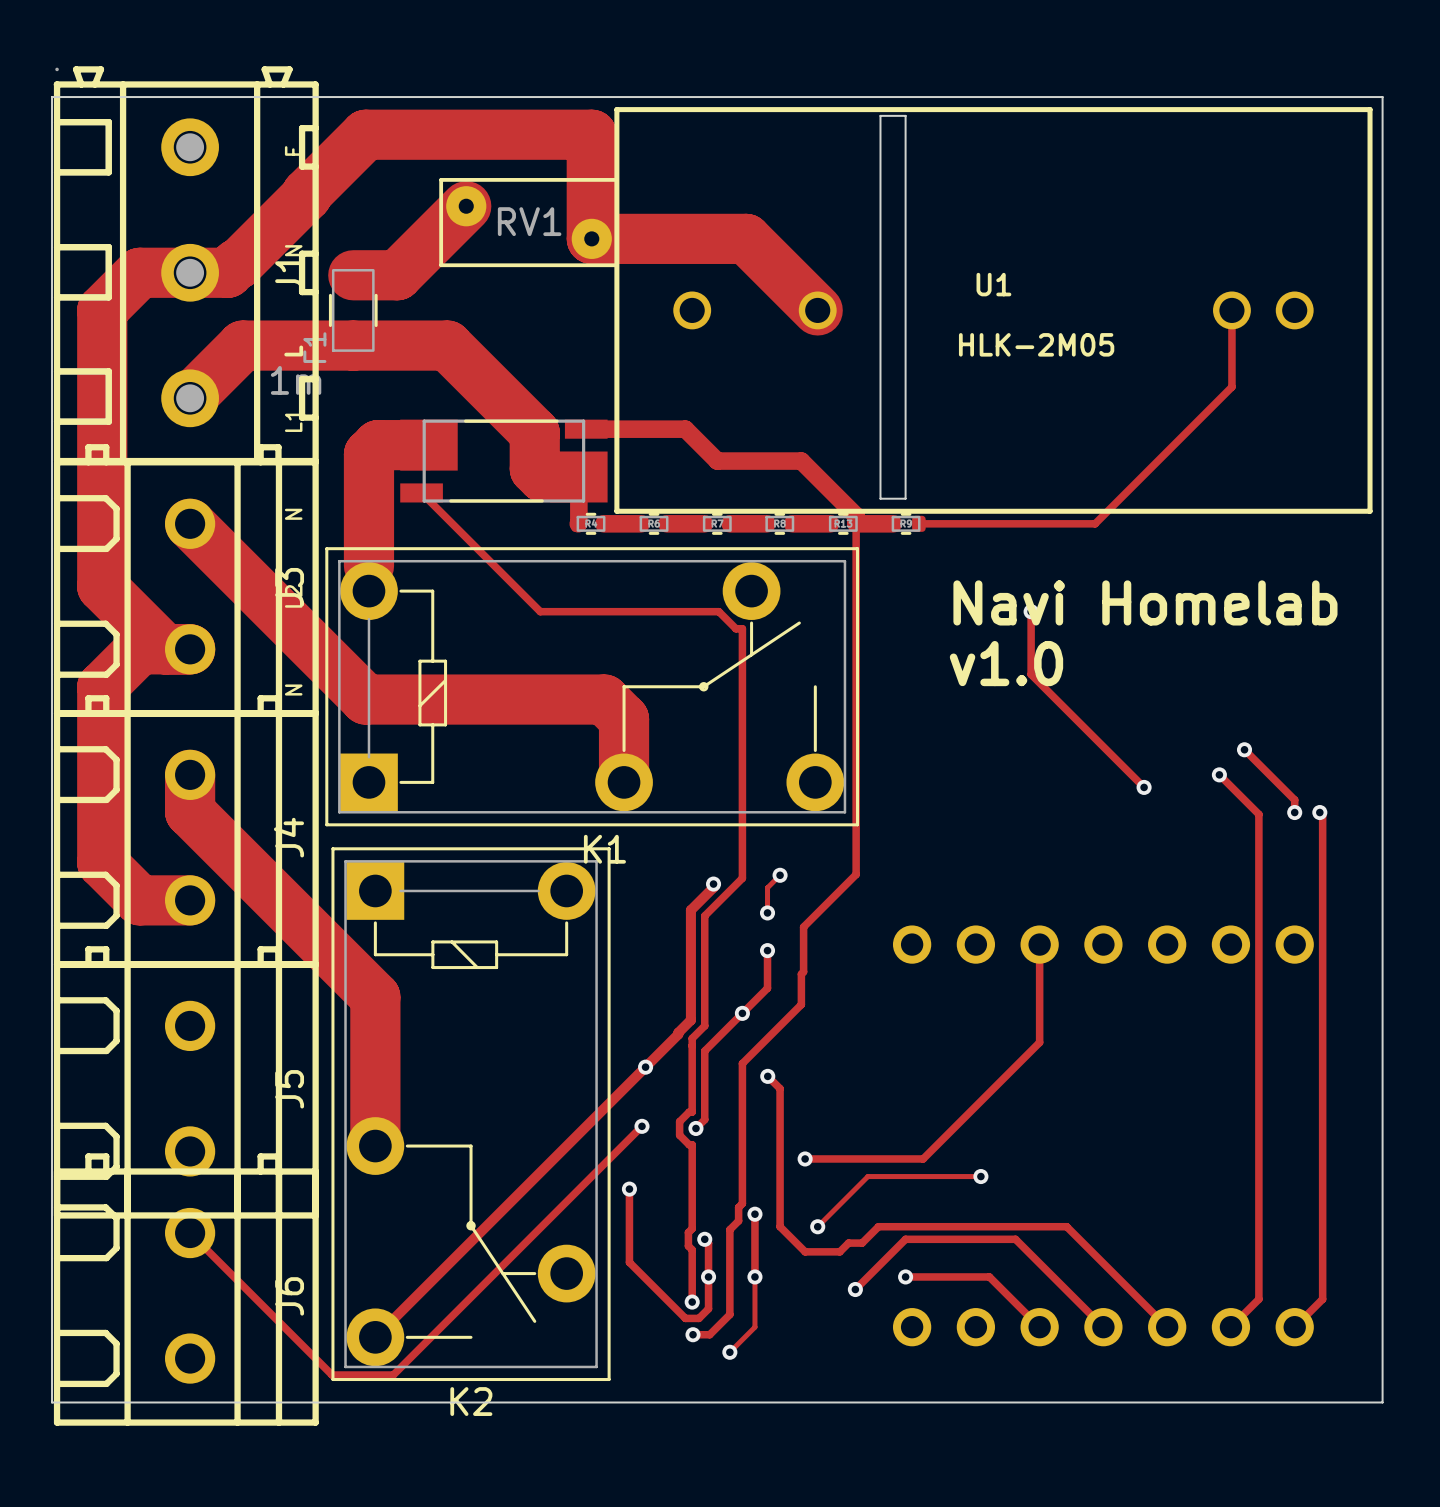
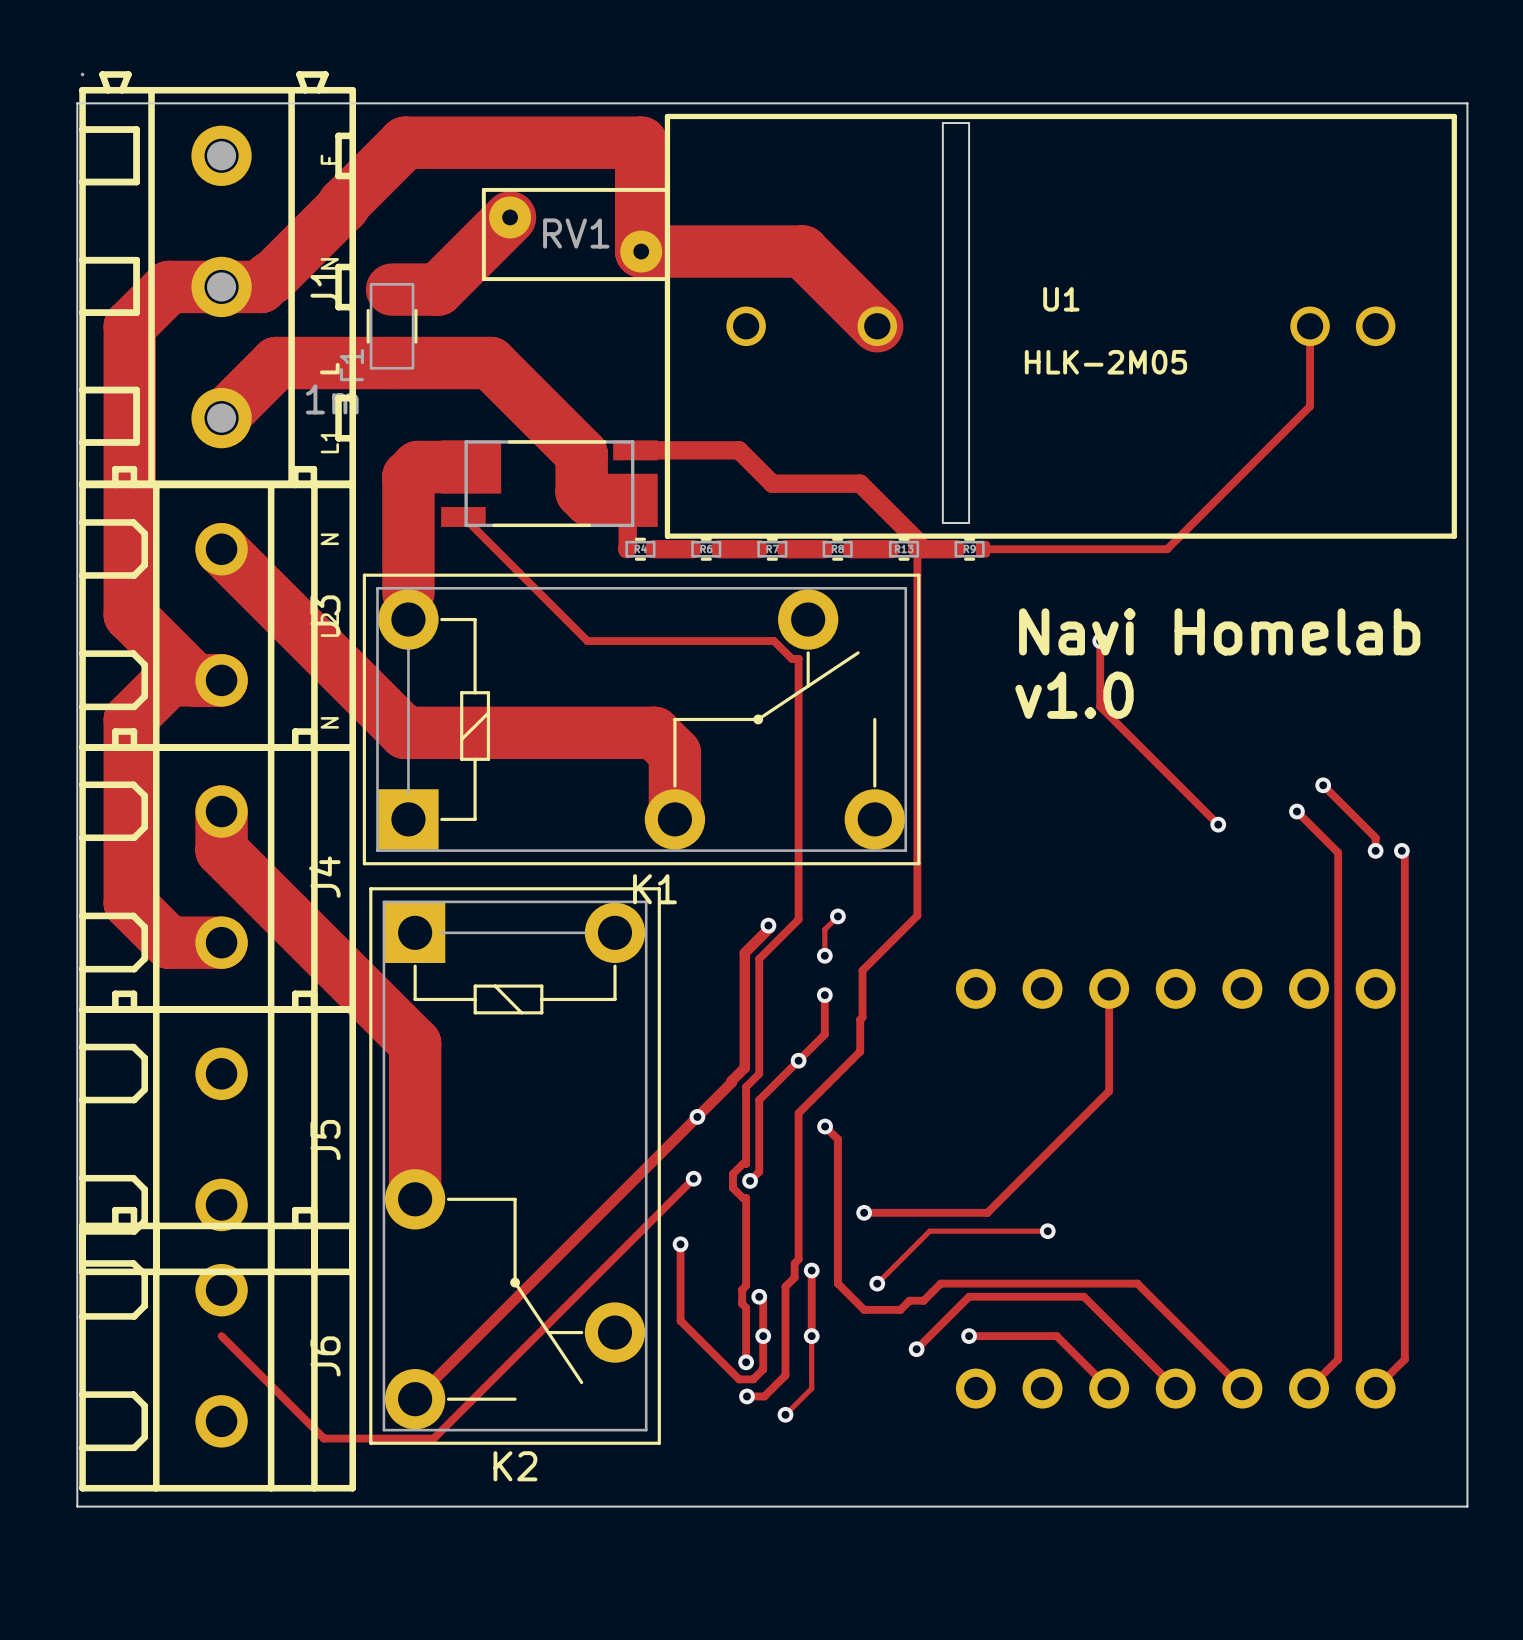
track: (190, 1233) (332, 1375) -> (221, 1336) (324, 1438) (369, 1438)
board edge: (52, 1402) (1382, 1402) -> (77, 1467) (77, 1506) (1467, 1506) (1467, 1467)

